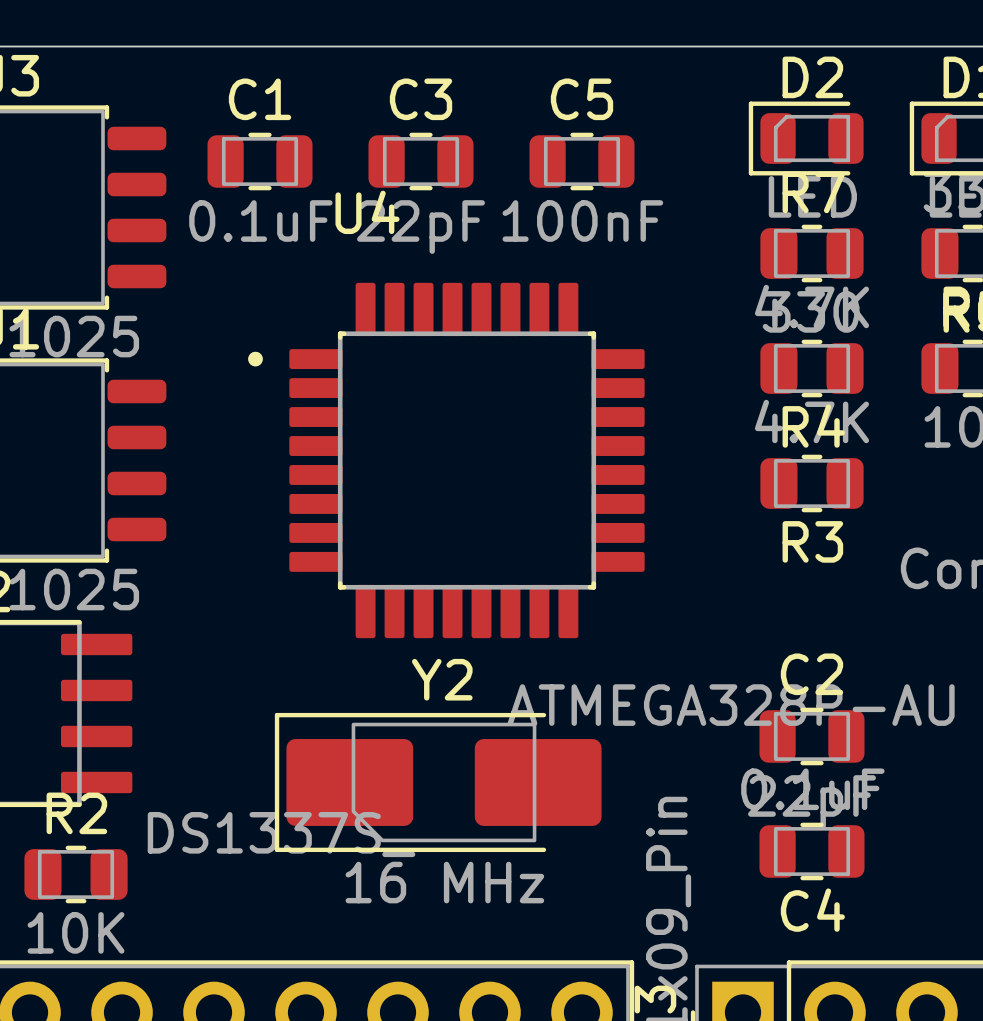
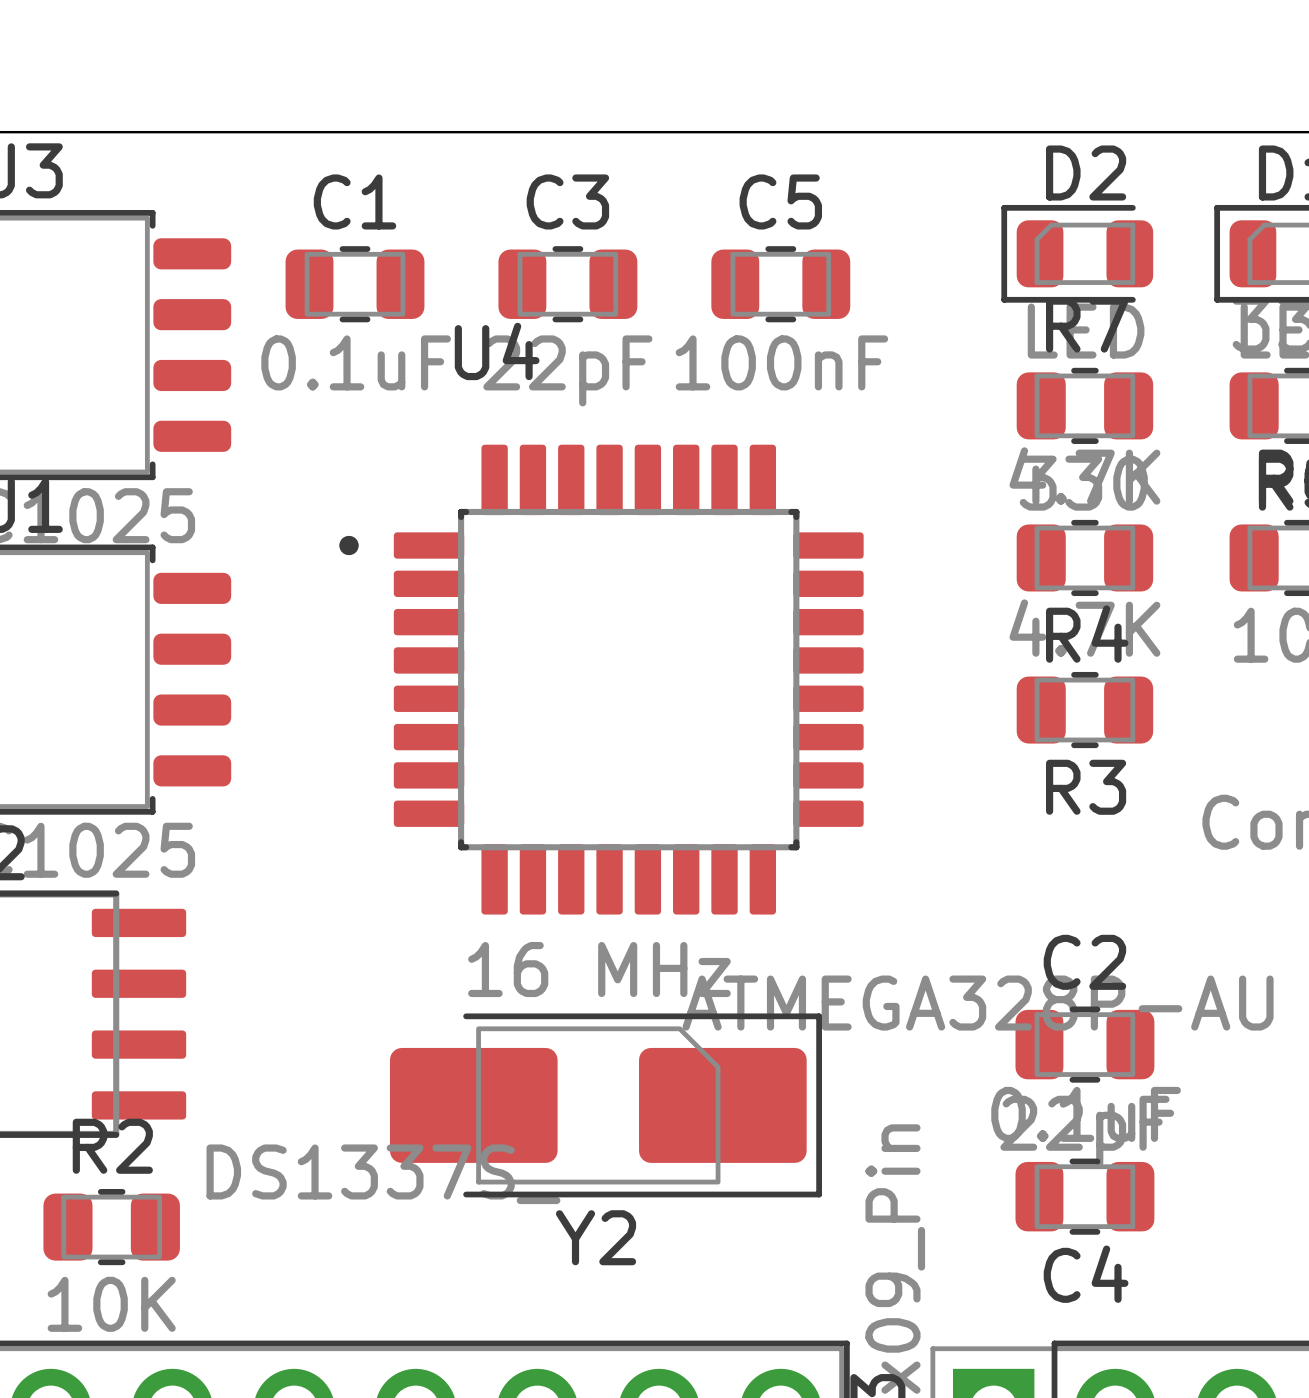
Y2 rotation: 0° (438, 782) -> 180° (605, 1105)

